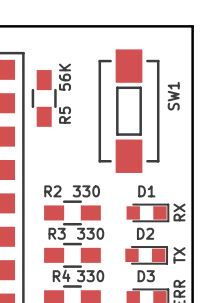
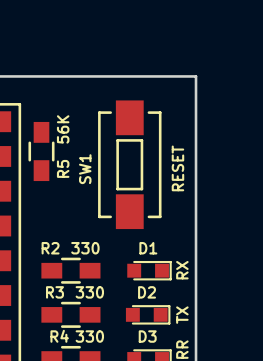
SW1 name position: SW1 (173, 96) -> SW1 (85, 169)
SW1 value: none -> RESET (177, 168)

